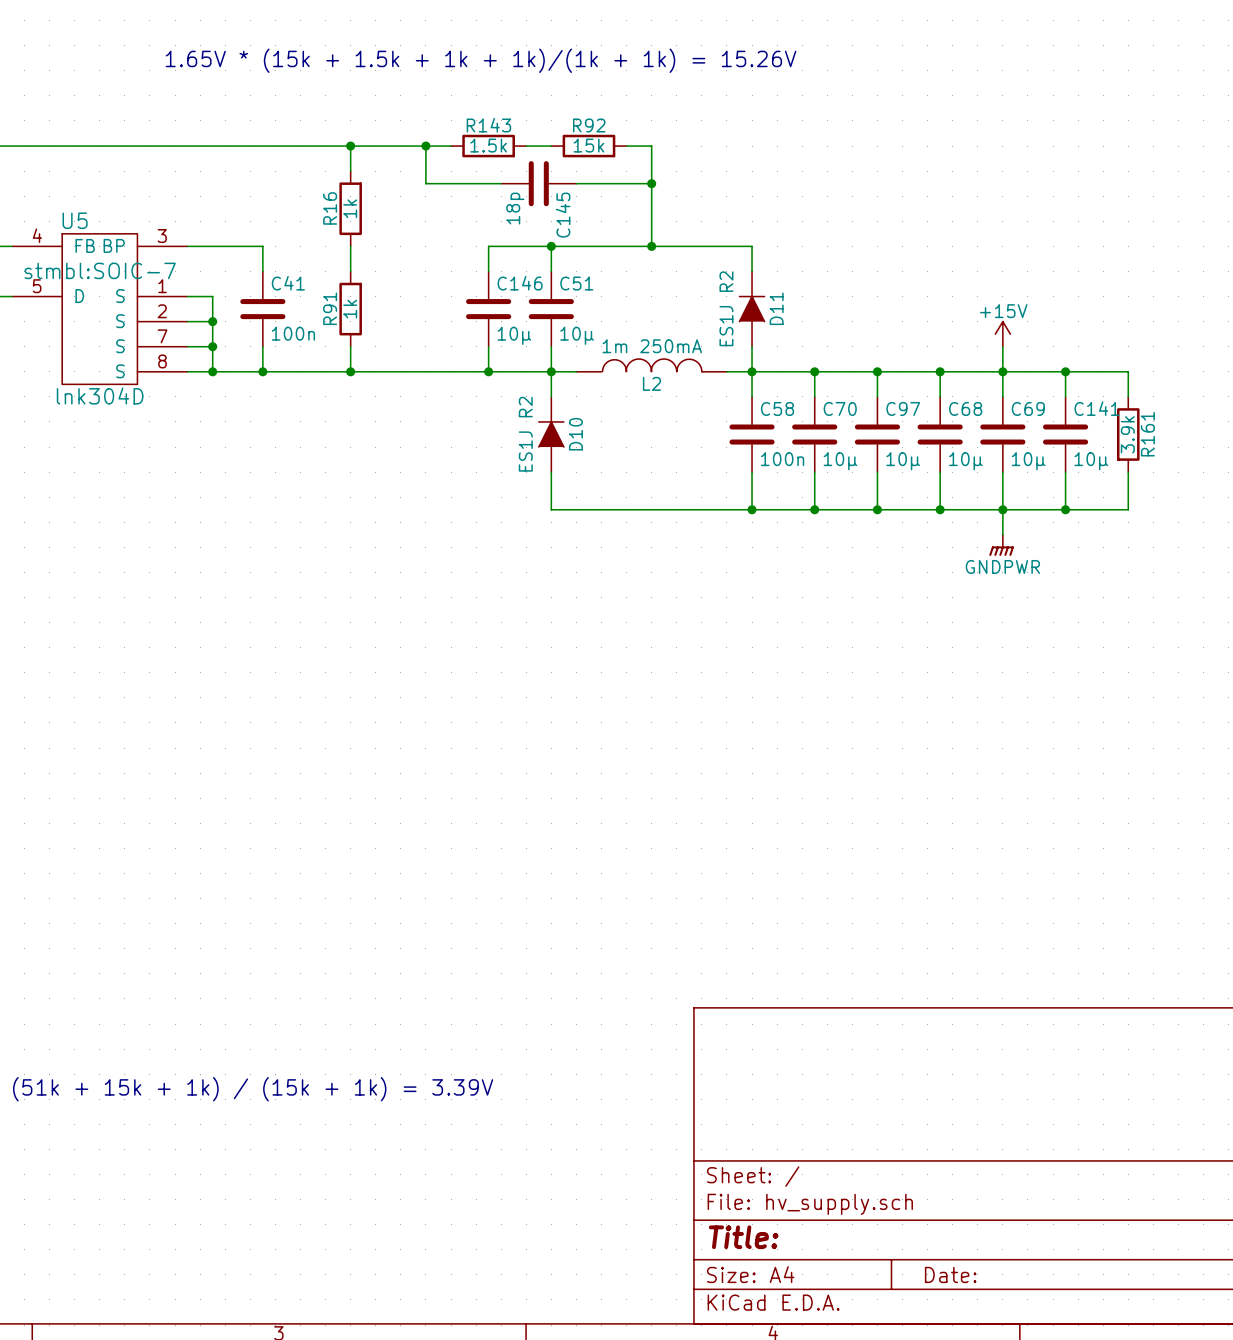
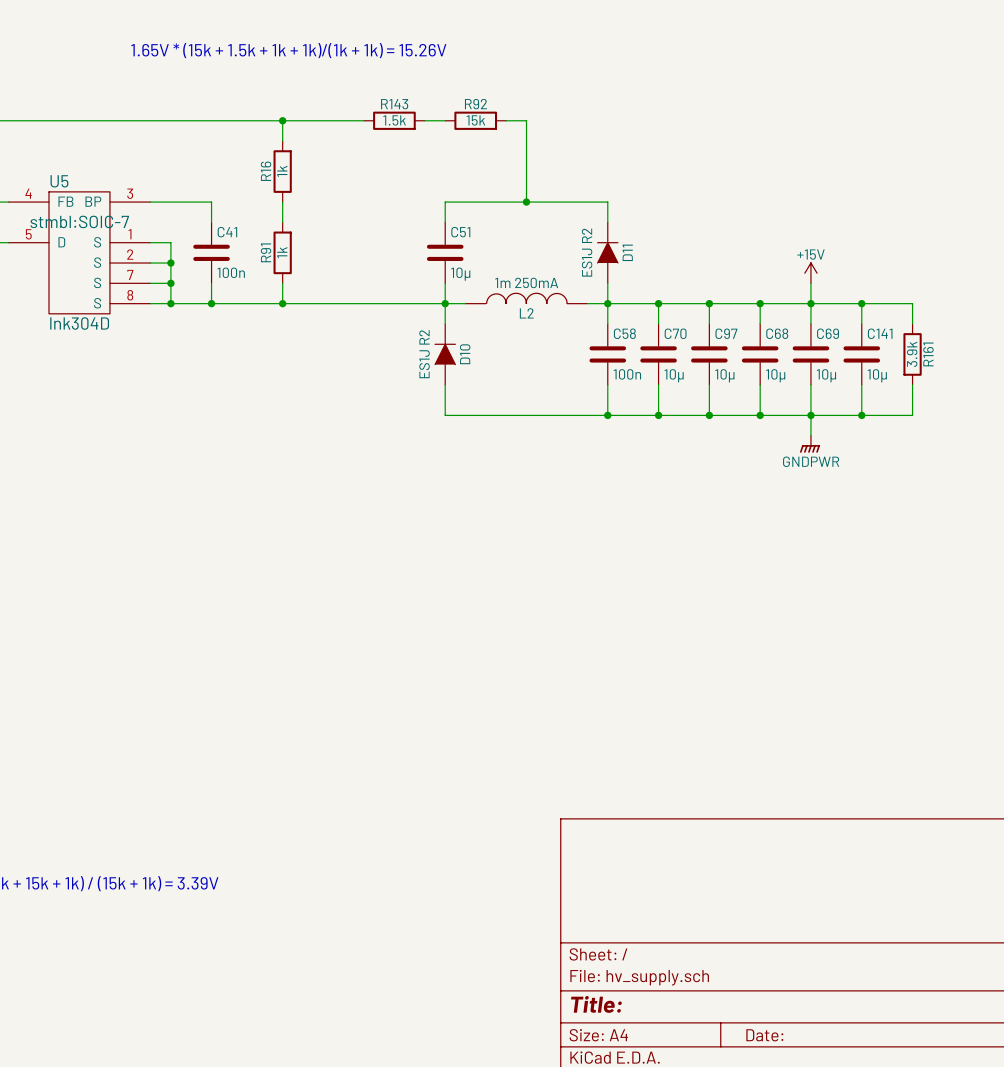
wire: (425, 146) (425, 183) (501, 183) -> none
junction: (425, 146) -> none
C145: 18p (538, 183) -> none
wire: (576, 183) (651, 183) -> none
junction: (651, 183) -> none
wire: (551, 246) (488, 246) (488, 271) -> none
junction: (551, 246) -> none
C146: 10µ (488, 309) -> none
wire: (488, 346) (488, 371) -> none
junction: (488, 371) -> none

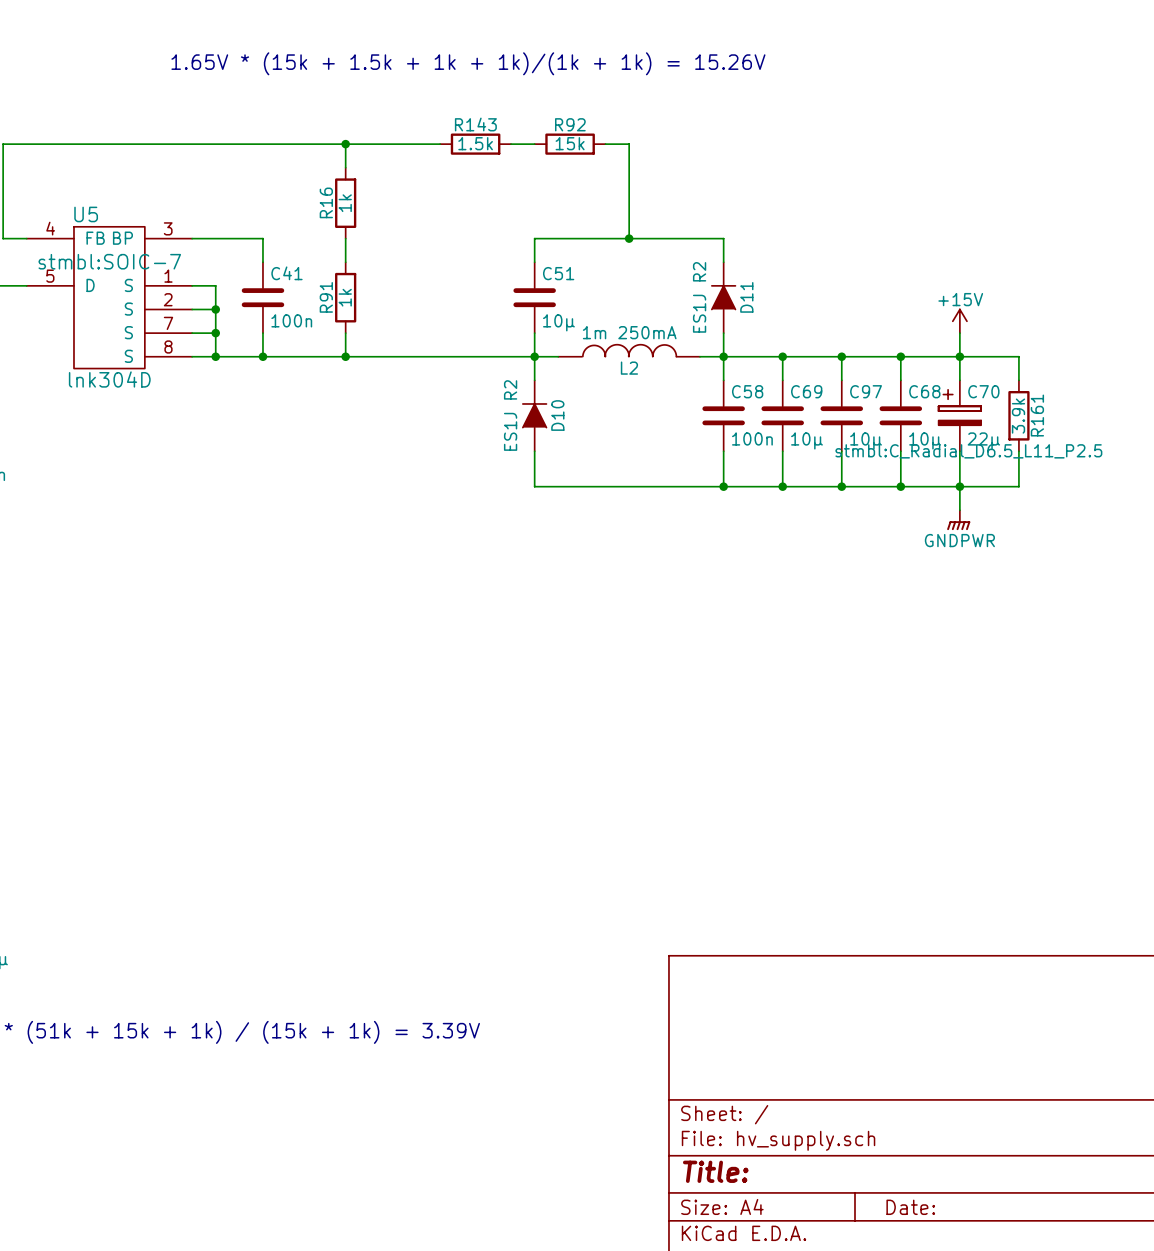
wire: (861, 303) (912, 303) (912, 323) -> none
junction: (861, 303) -> none
C70 name: C70 (675, 333) -> C69 (806, 391)
C69: 10µ (810, 354) -> none
C70: none -> 22µ (959, 415)
C141: 10µ (861, 354) -> none
R161 position: (912, 354) -> (1018, 415)
wire: (912, 384) (912, 415) (861, 415) -> none
junction: (861, 415) -> none

